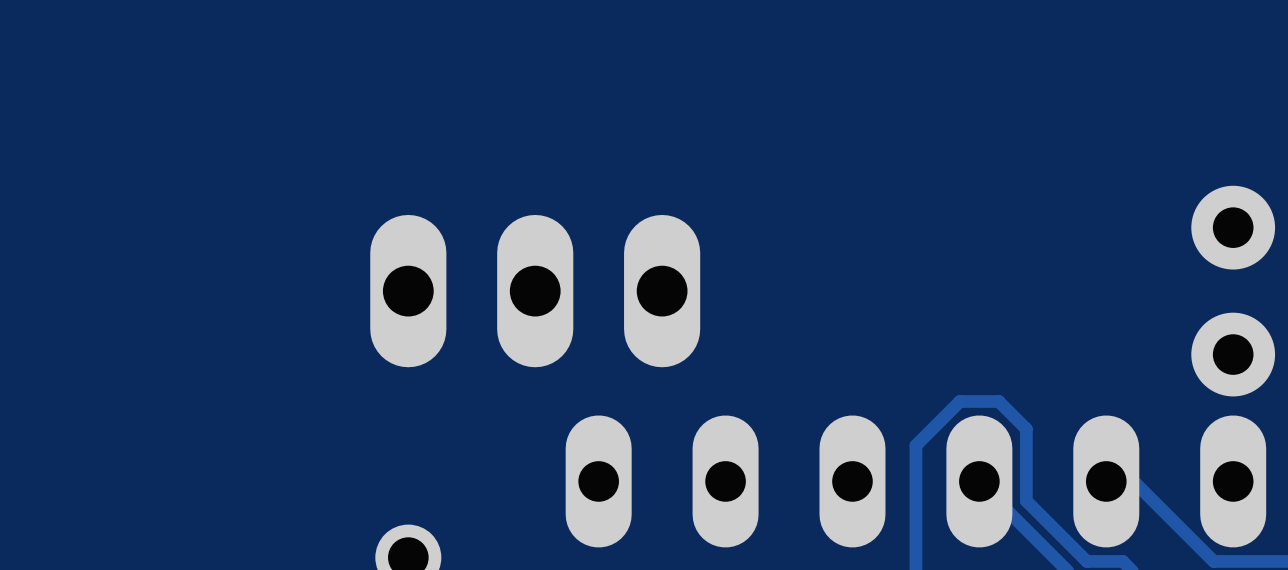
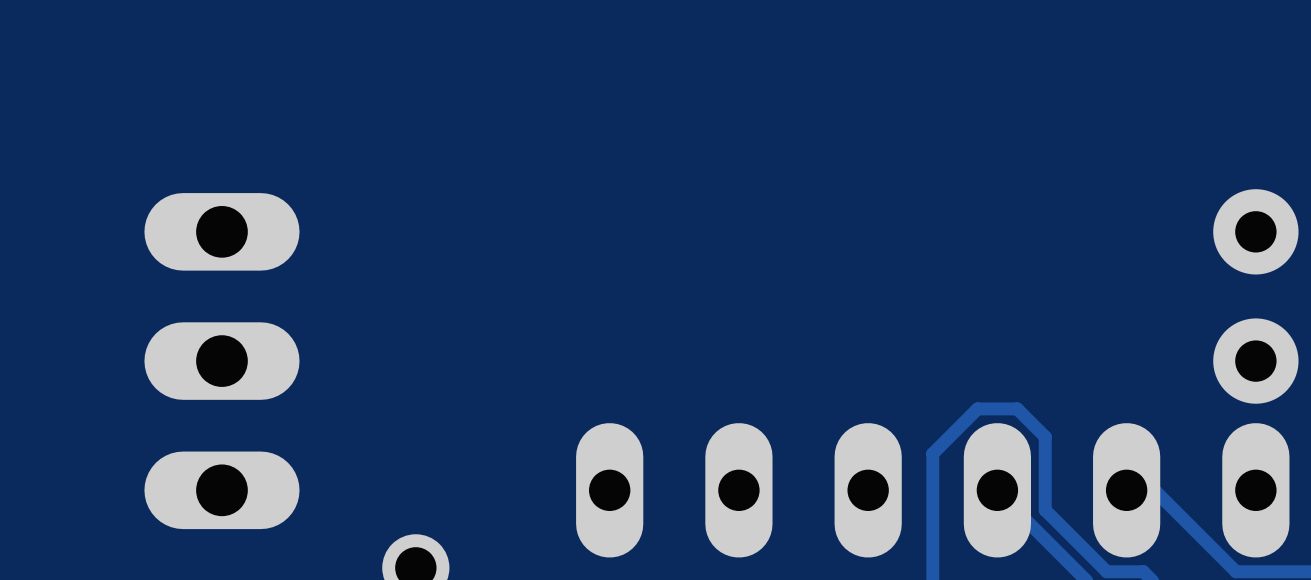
part rotation: 0° (535, 291) -> 90° clockwise (221, 361)
part position: (535, 291) -> (221, 361)

